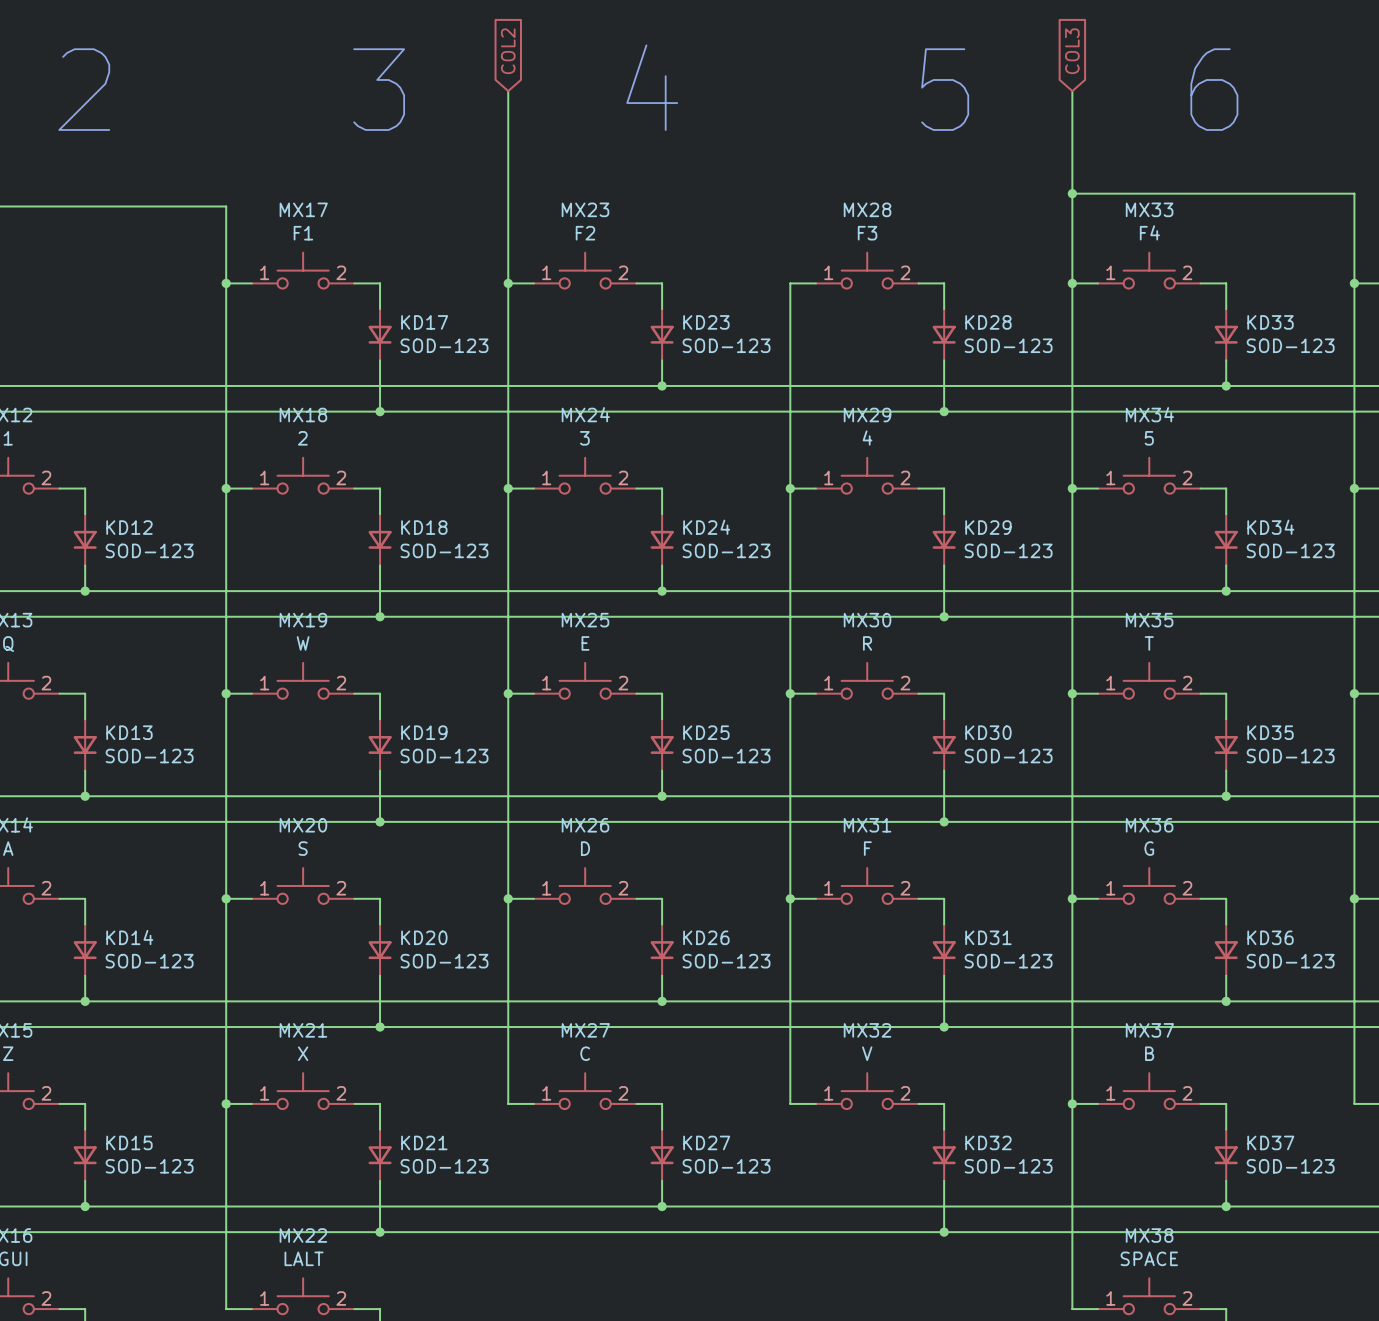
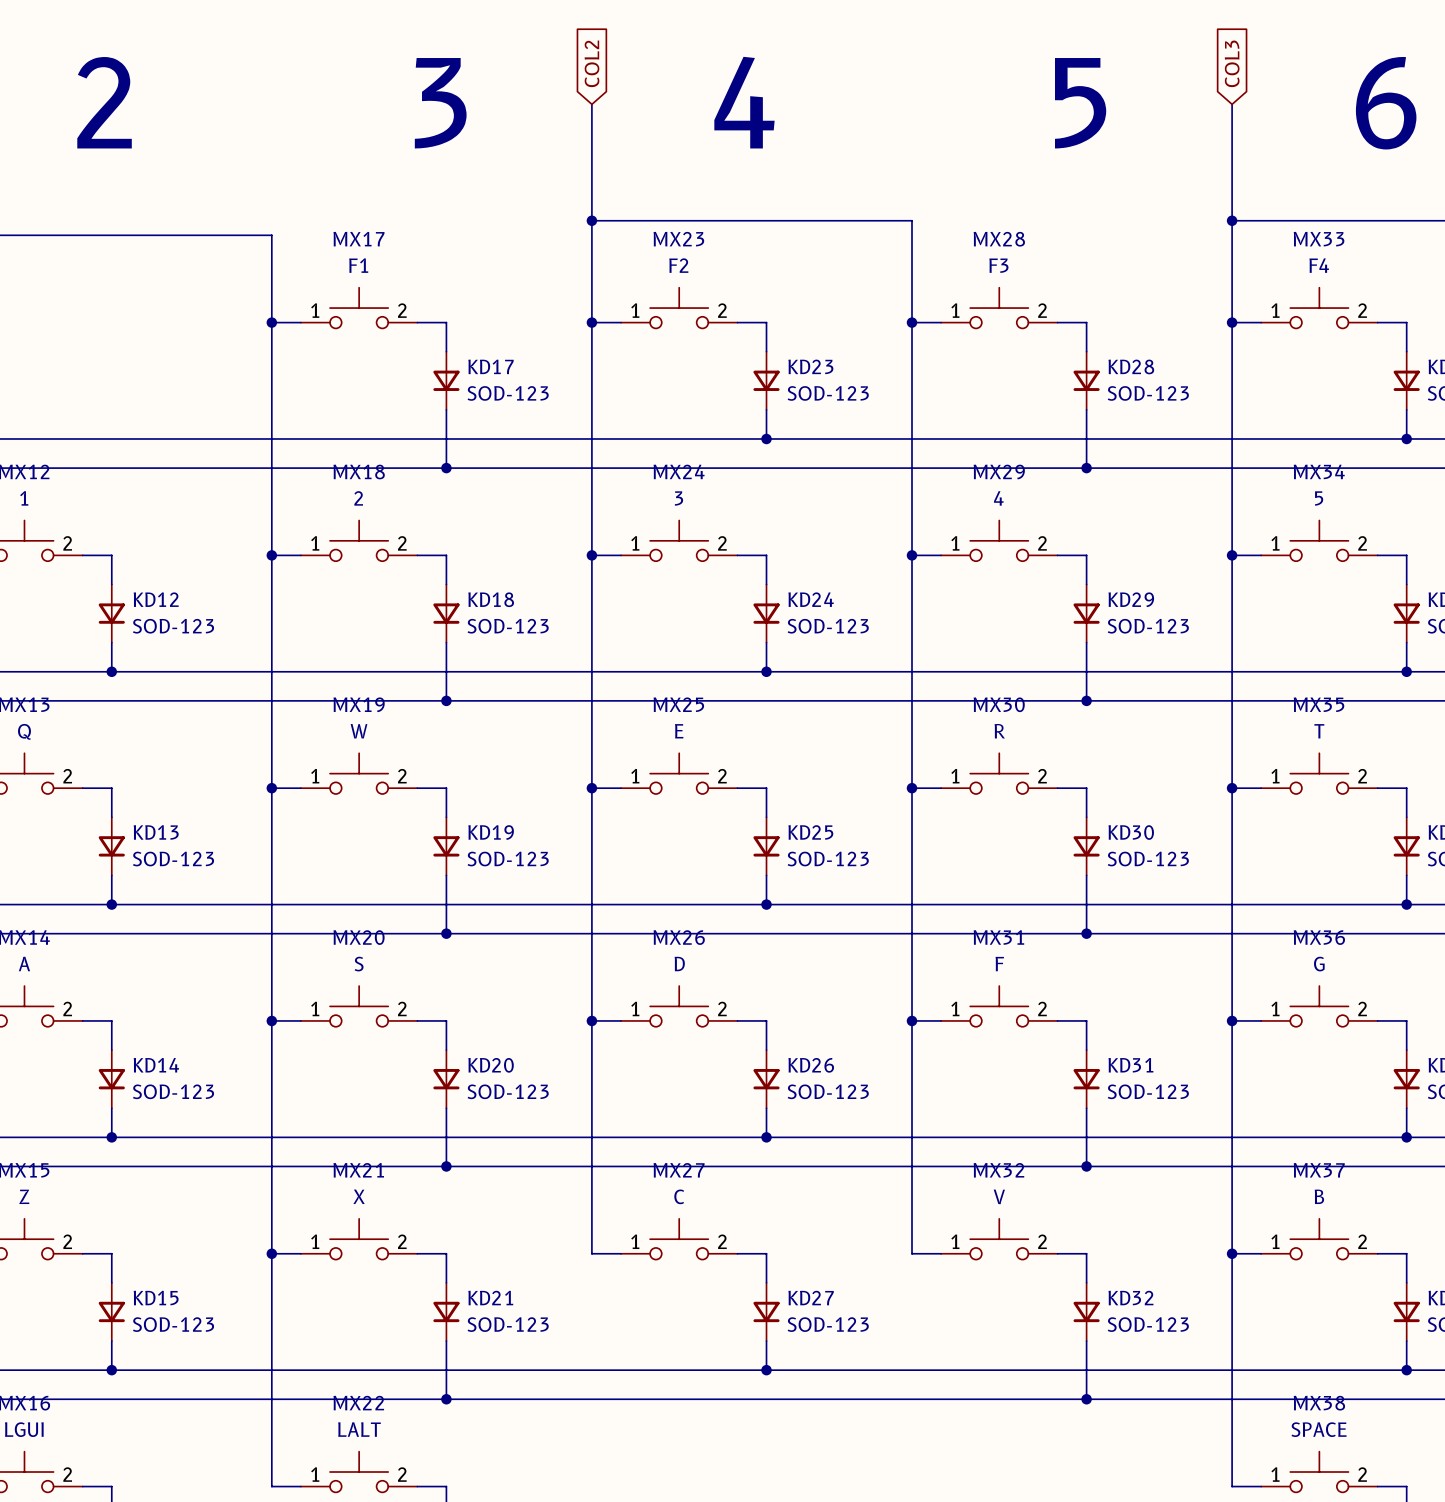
wire: none -> (591, 220) (912, 220) (912, 322)
junction: none -> (591, 220)
junction: none -> (912, 322)

